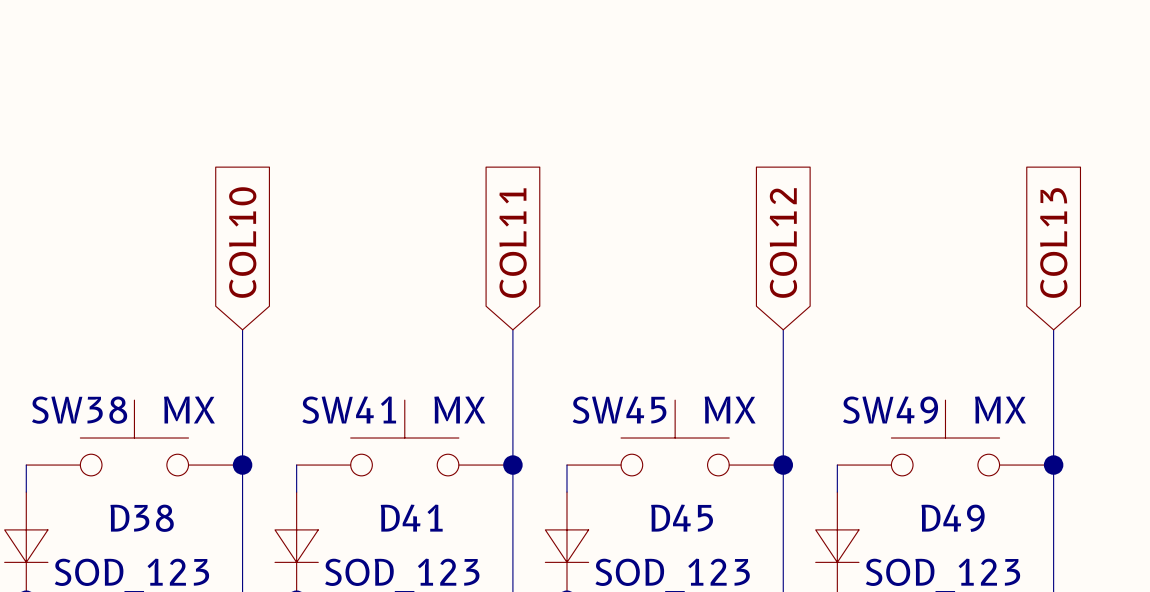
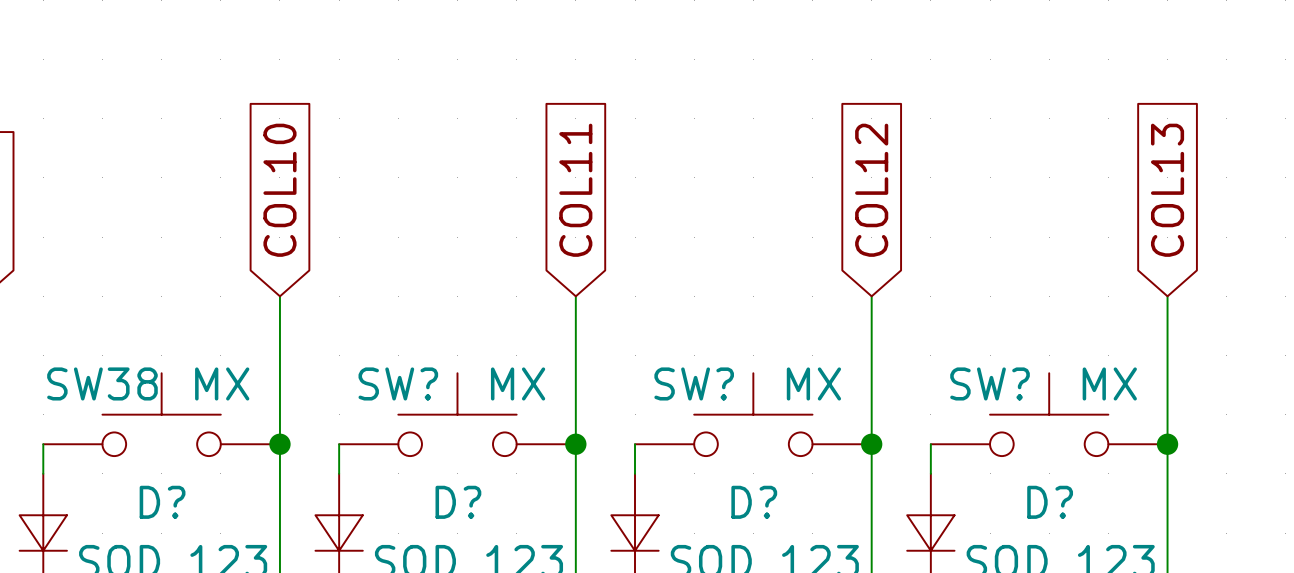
SW41 name: SW41 (349, 410) -> SW? (398, 383)
SW45 name: SW45 (619, 410) -> SW? (694, 383)
SW49 name: SW49 (890, 410) -> SW? (990, 383)
D38 name: D38 (142, 518) -> D? (162, 502)
D41 name: D41 (411, 518) -> D? (458, 502)
D45 name: D45 (682, 518) -> D? (754, 502)
D49 name: D49 (953, 518) -> D? (1050, 502)

